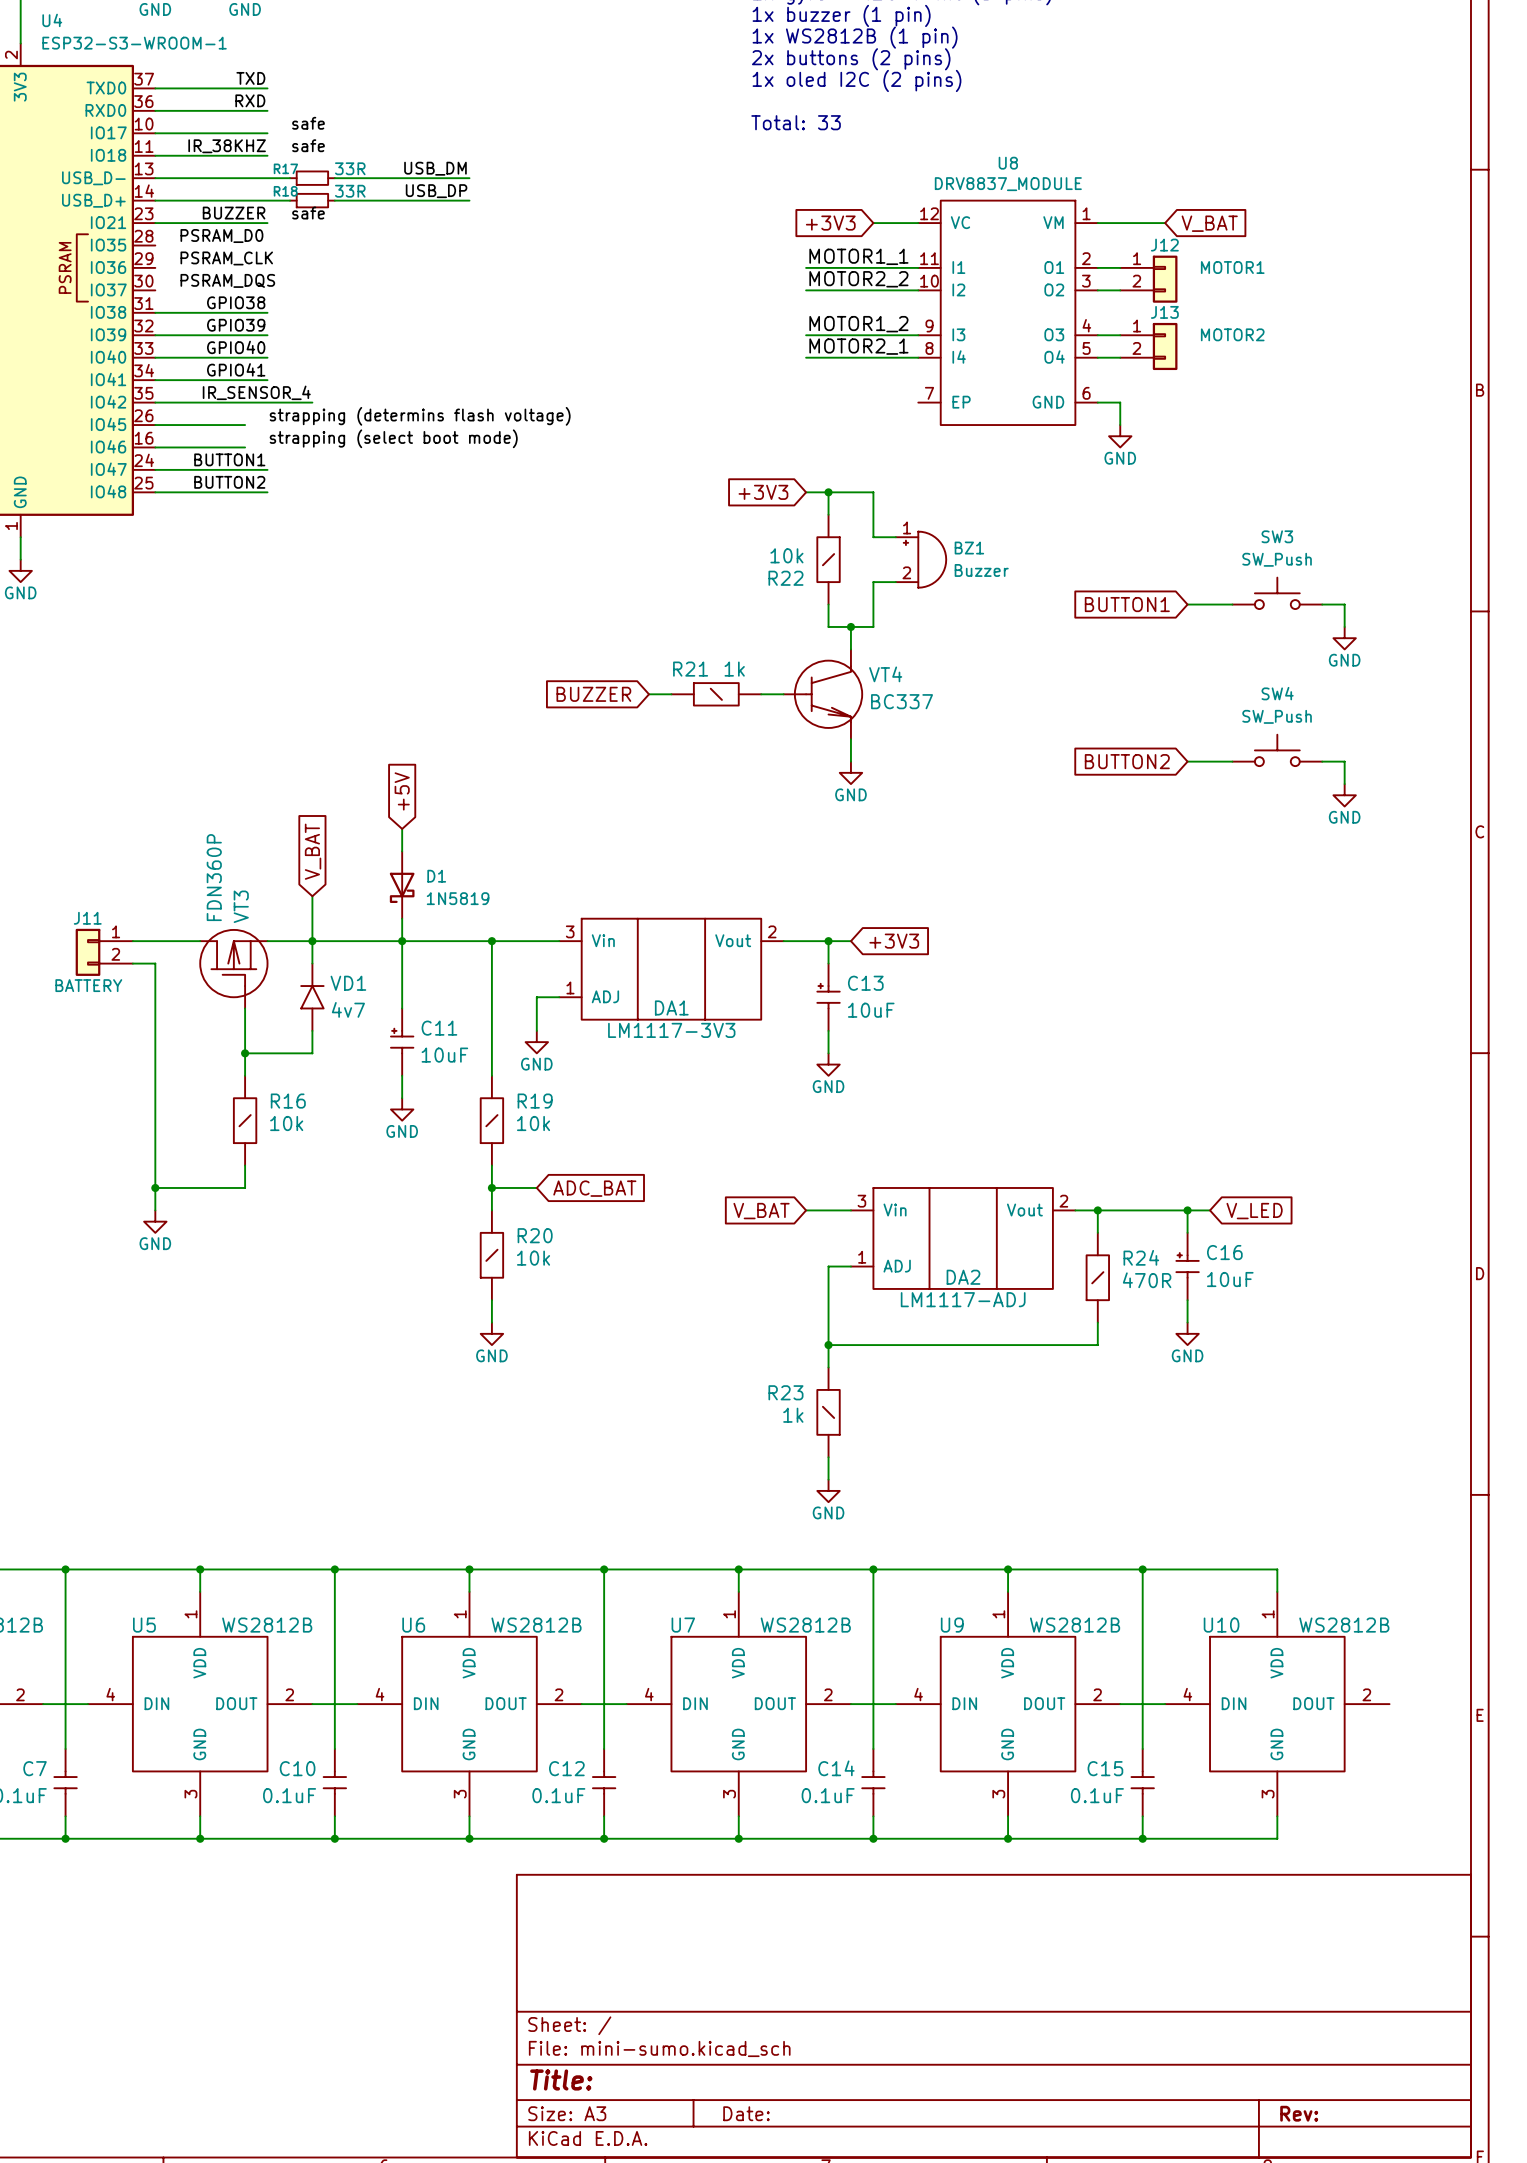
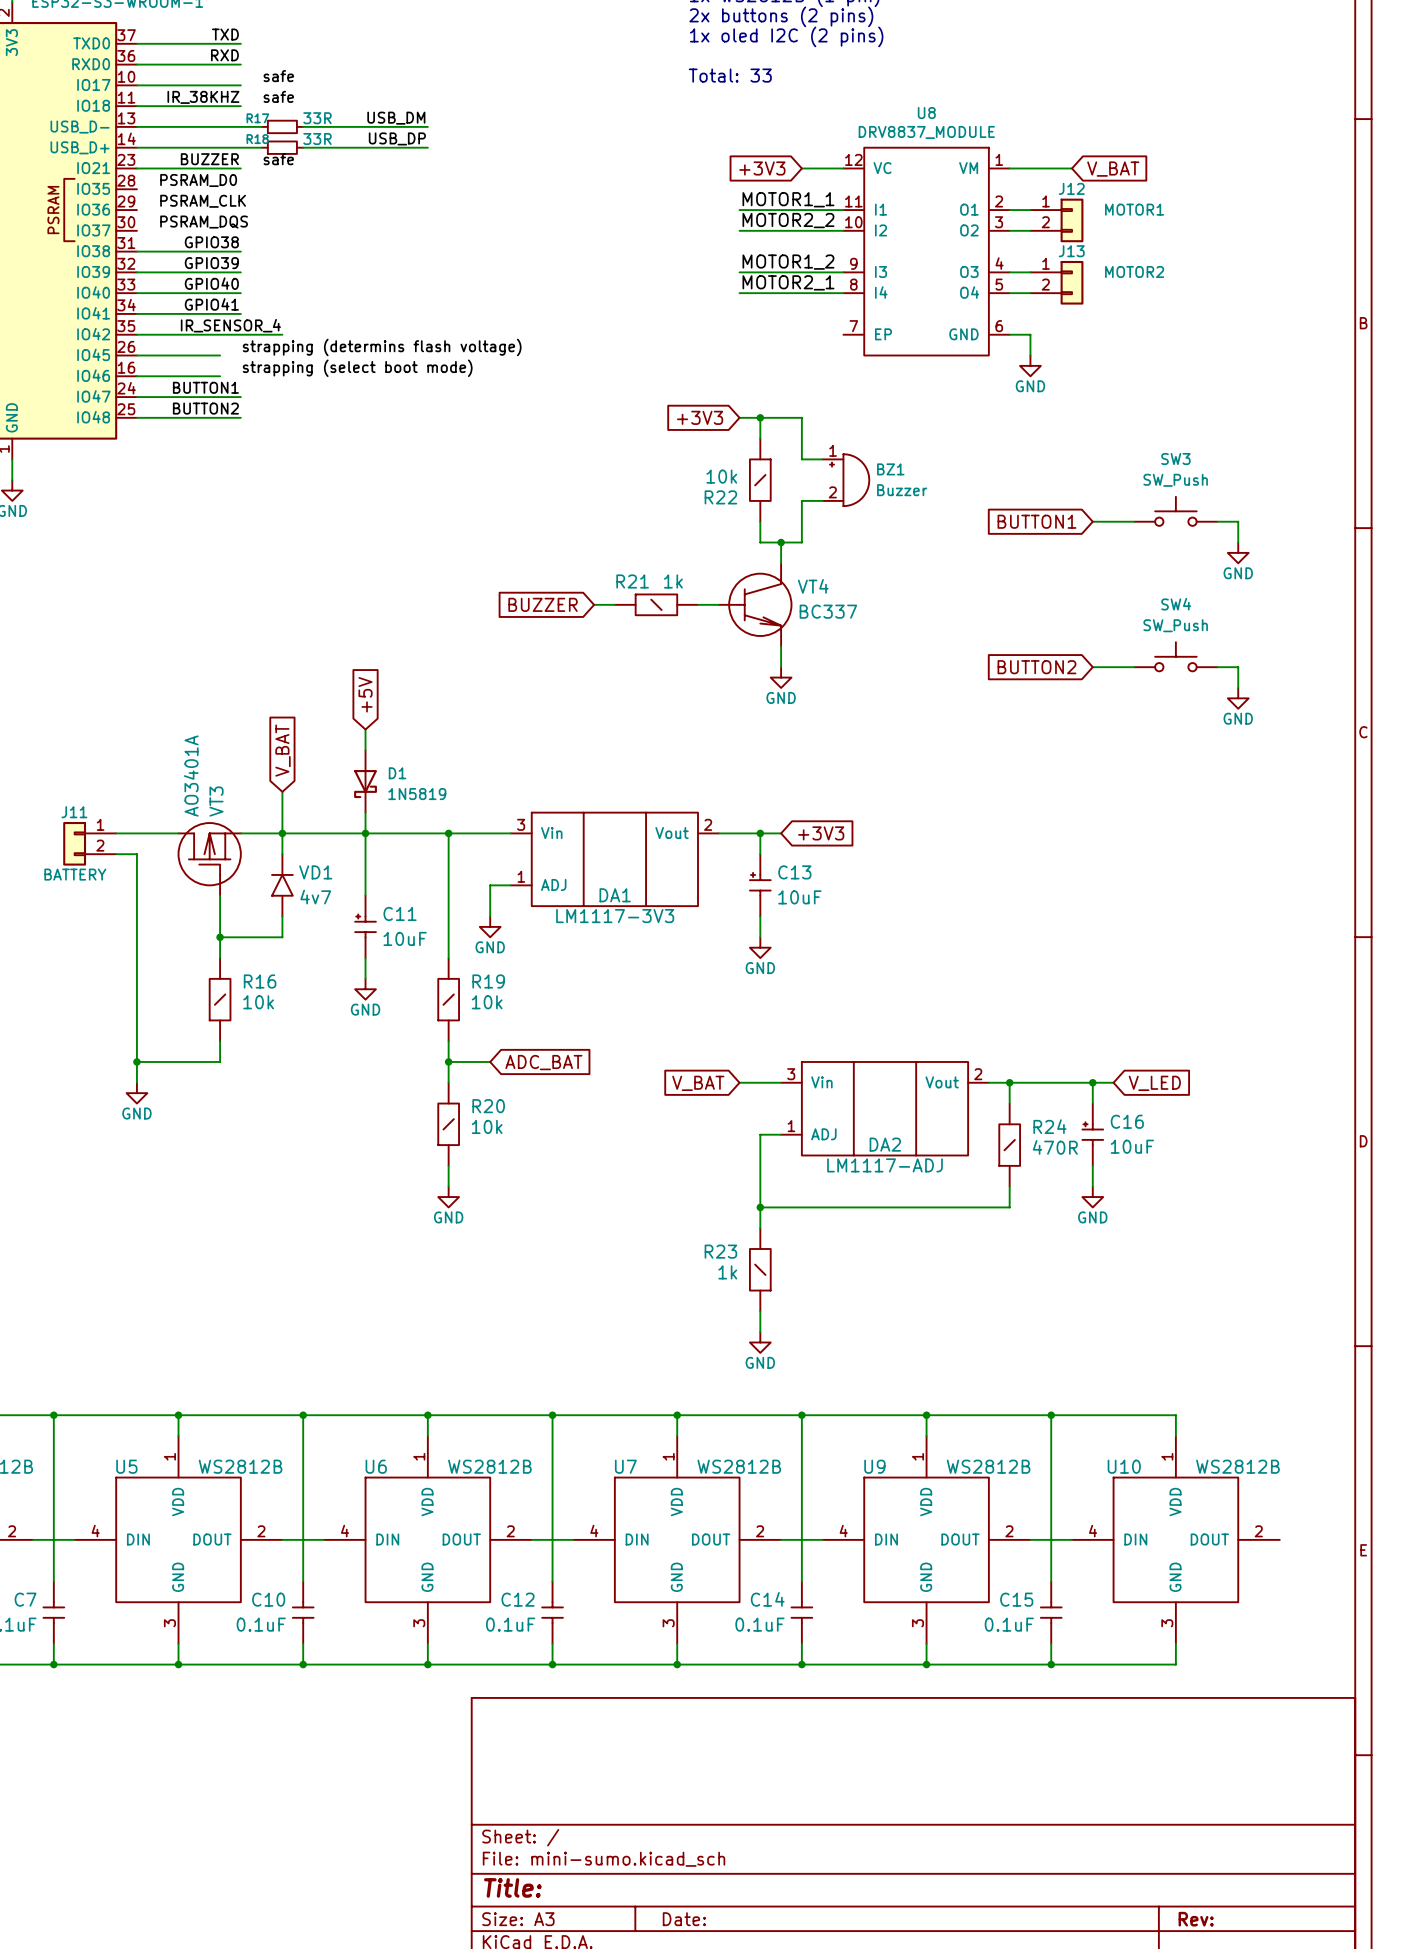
VT3 value: FDN360P (214, 877) -> AO3401A (191, 776)

